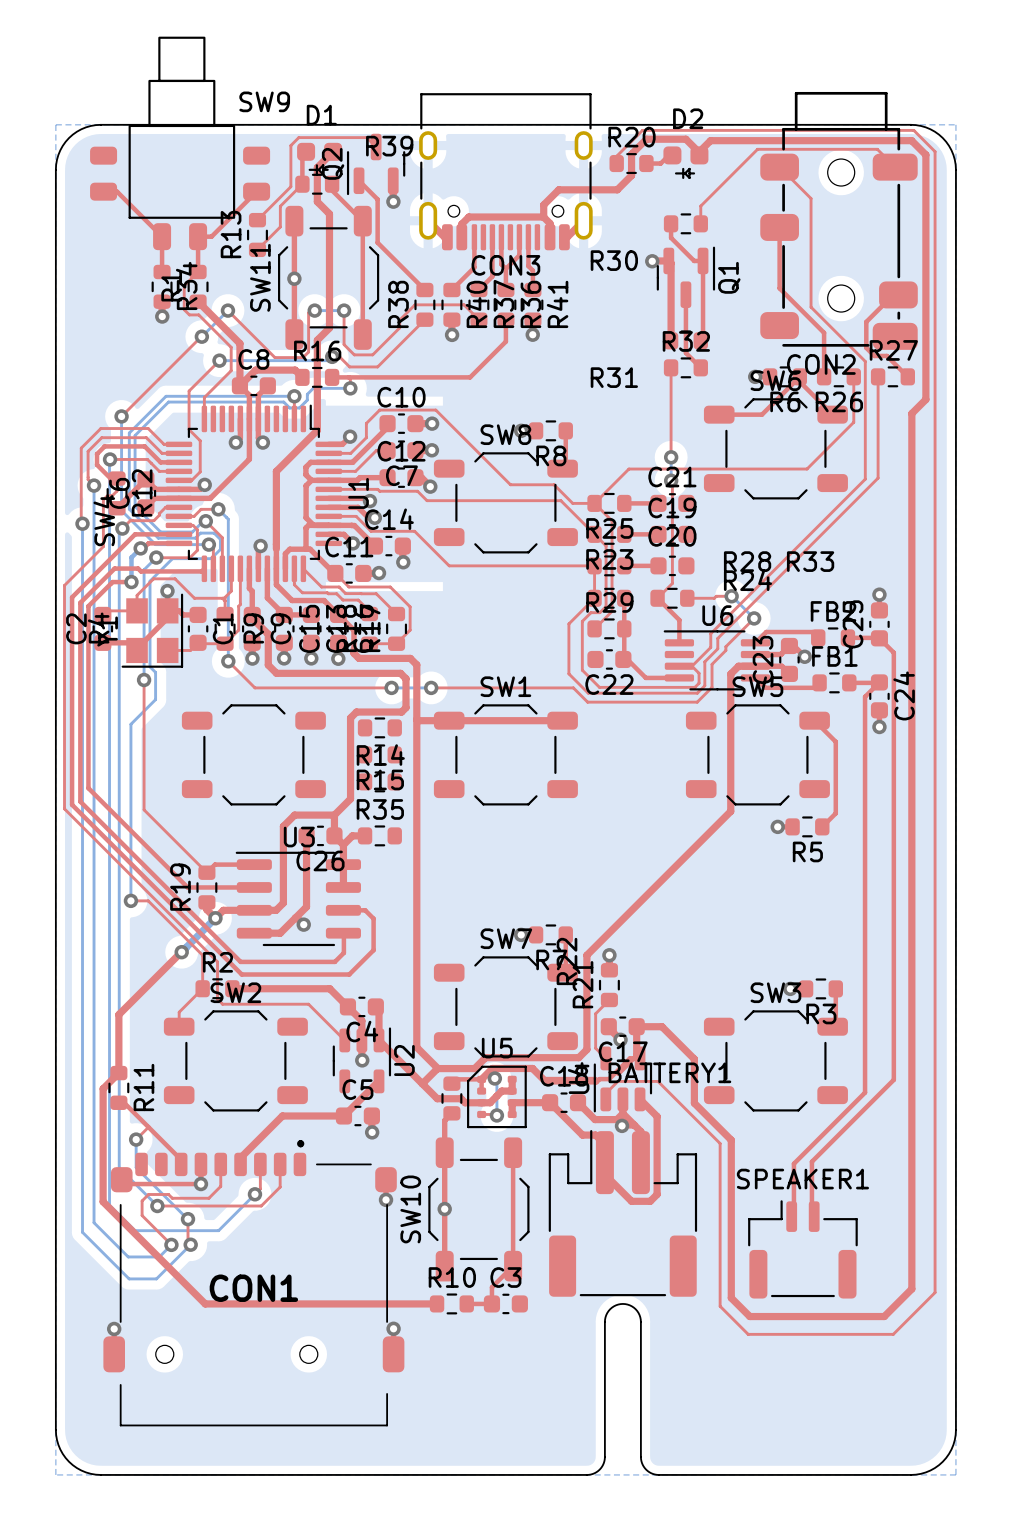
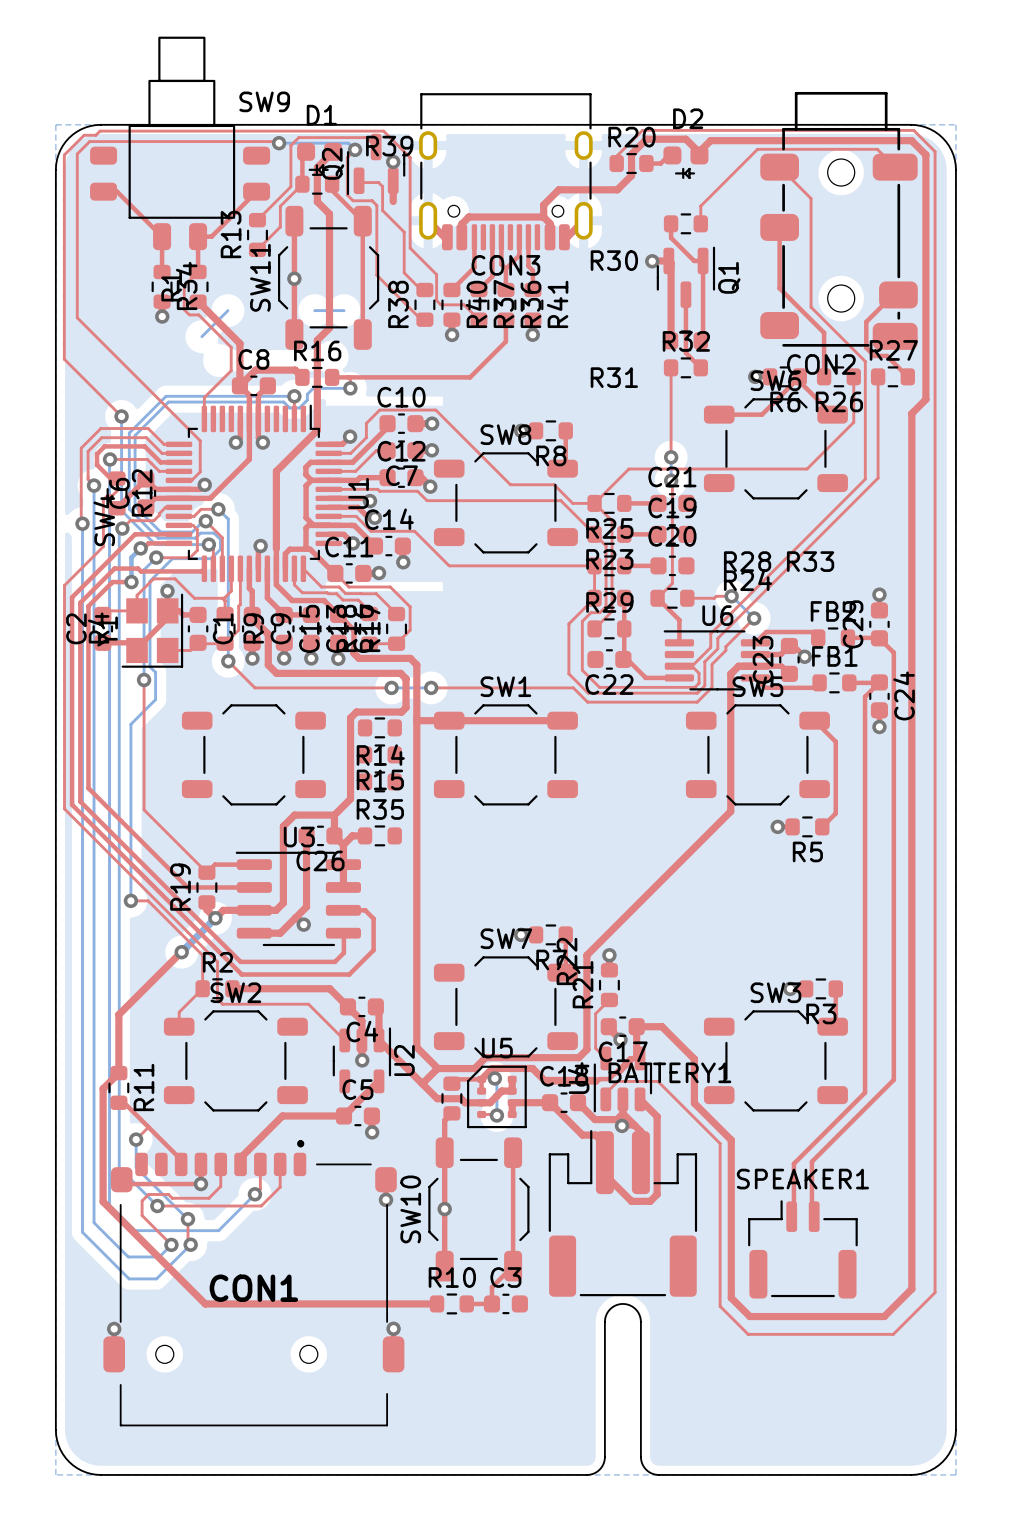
bottom track: none -> (279, 143) (348, 143) (355, 149)
via: none -> (279, 143)
top track: none -> (355, 149) (347, 157) (347, 195) (353, 200) (372, 200) (376, 205) (376, 275) (421, 319)
via: none -> (355, 149)
via: none -> (393, 161)
top track: (359, 180) (377, 199) (377, 242) (424, 289) -> none
top track: none -> (358, 182) (378, 182) (382, 186) (382, 210) (404, 232) (404, 272) (421, 289)
via: (393, 201) -> none
top track: (440, 304) (415, 304) (399, 320) (399, 327) (372, 354) (354, 354) (344, 344) (344, 310) -> none
top track: (227, 310) (274, 357) (303, 357) (308, 352) (308, 312) (314, 310) -> none
via: (227, 310) -> none
via: (314, 310) -> none
via: (344, 310) -> none
top track: (424, 319) (377, 366) (349, 366) (339, 356) (332, 356) -> none
top track: (201, 336) (121, 416) -> (440, 304) (436, 300) (436, 274) (410, 248) (410, 157) (383, 131) (99, 131) (95, 135) (84, 135) (64, 155) (64, 359) (121, 416)
via: (201, 336) -> none
bottom track: (332, 356) (328, 360) (219, 360) -> none
via: (332, 356) -> none
top track: (219, 360) (189, 391) (189, 429) -> (277, 141) (89, 141) (77, 153) (77, 317) (189, 429)
via: (219, 360) -> none

